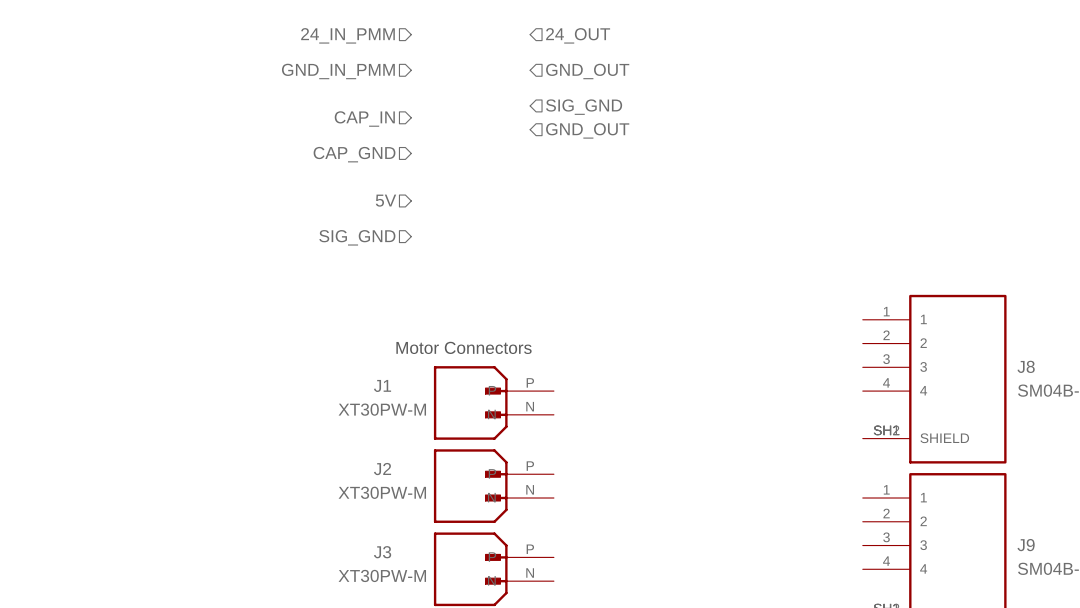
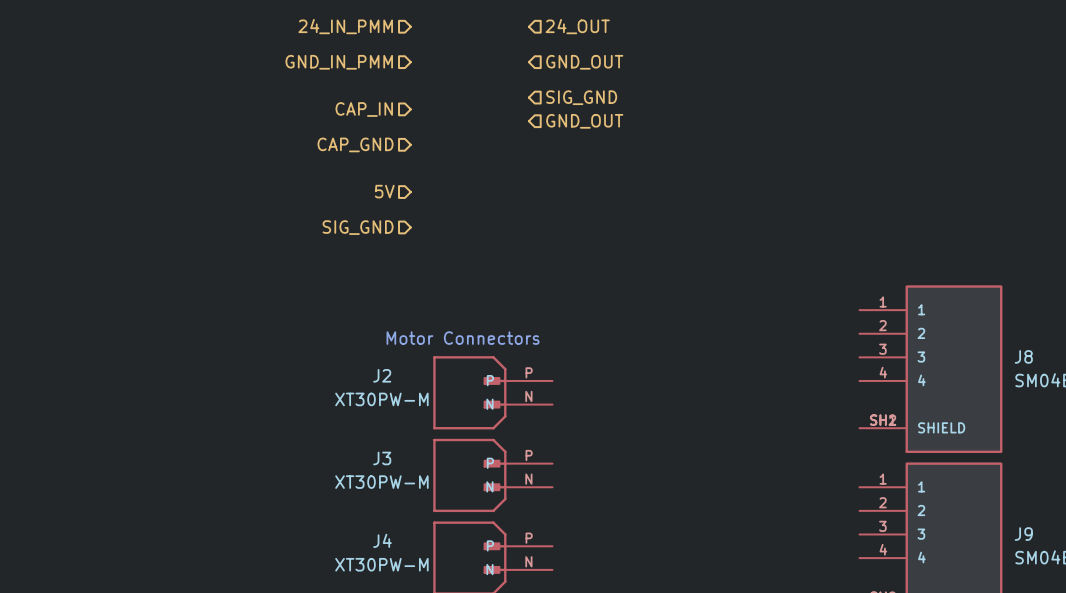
J1 name: J1 (382, 385) -> J2 (382, 375)
J2 name: J2 (382, 469) -> J3 (382, 458)
J3 name: J3 (382, 552) -> J4 (382, 540)

